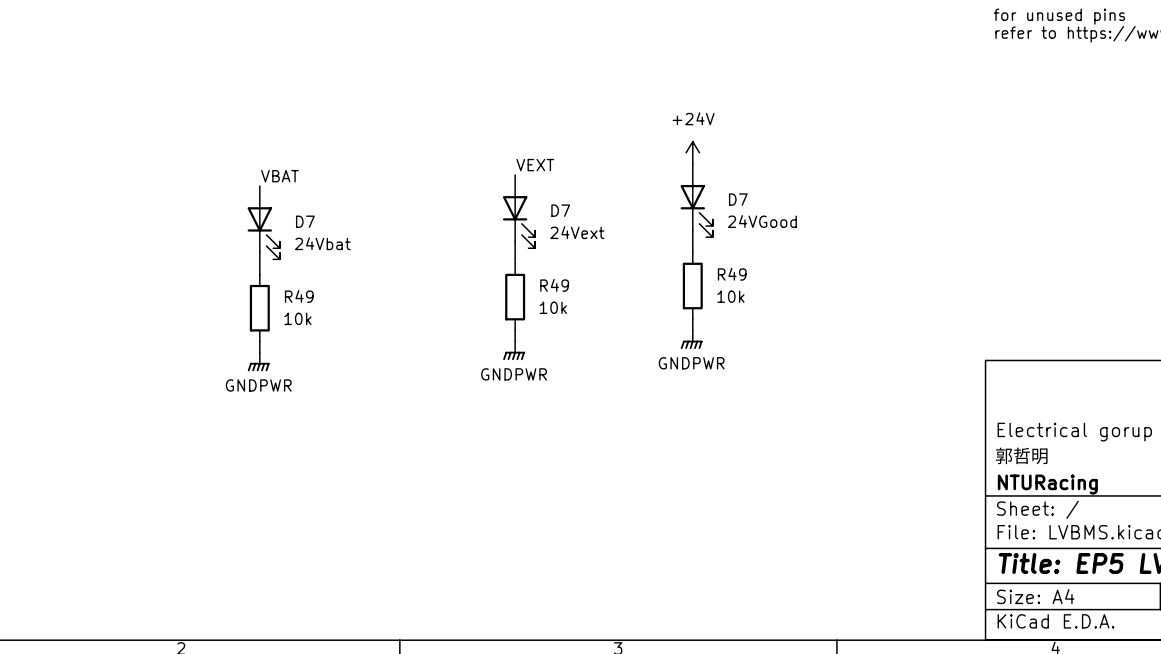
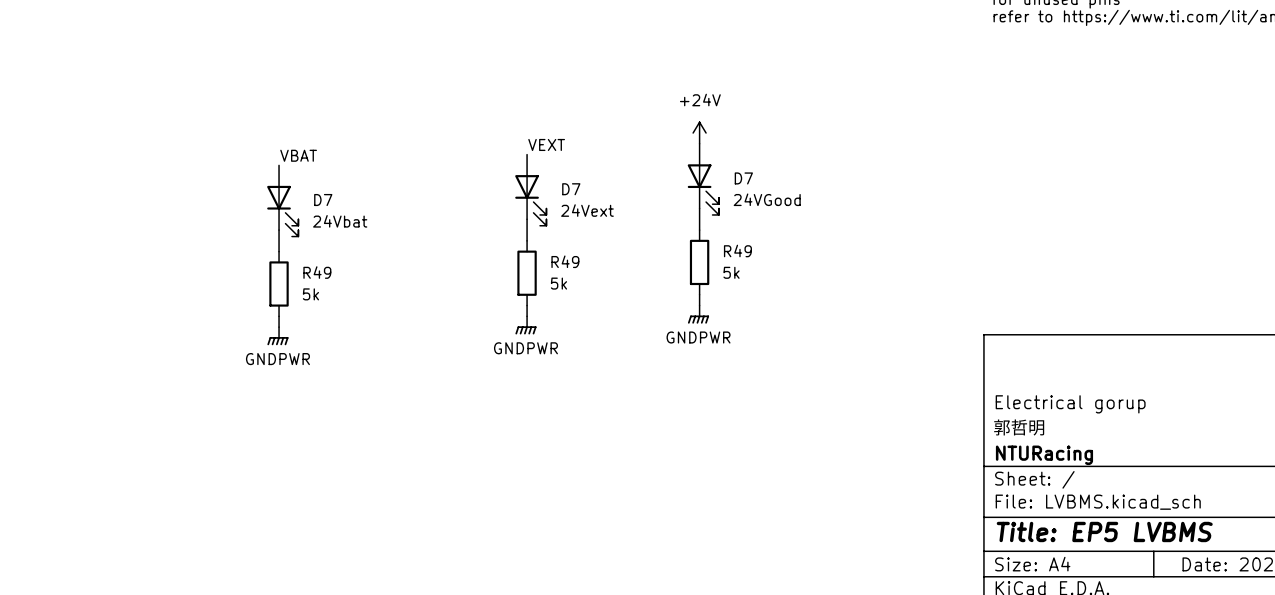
R49 value: 10k (730, 296) -> 5k (731, 272)
R49 value: 10k (553, 307) -> 5k (558, 283)
R49 value: 10k (297, 318) -> 5k (310, 294)

